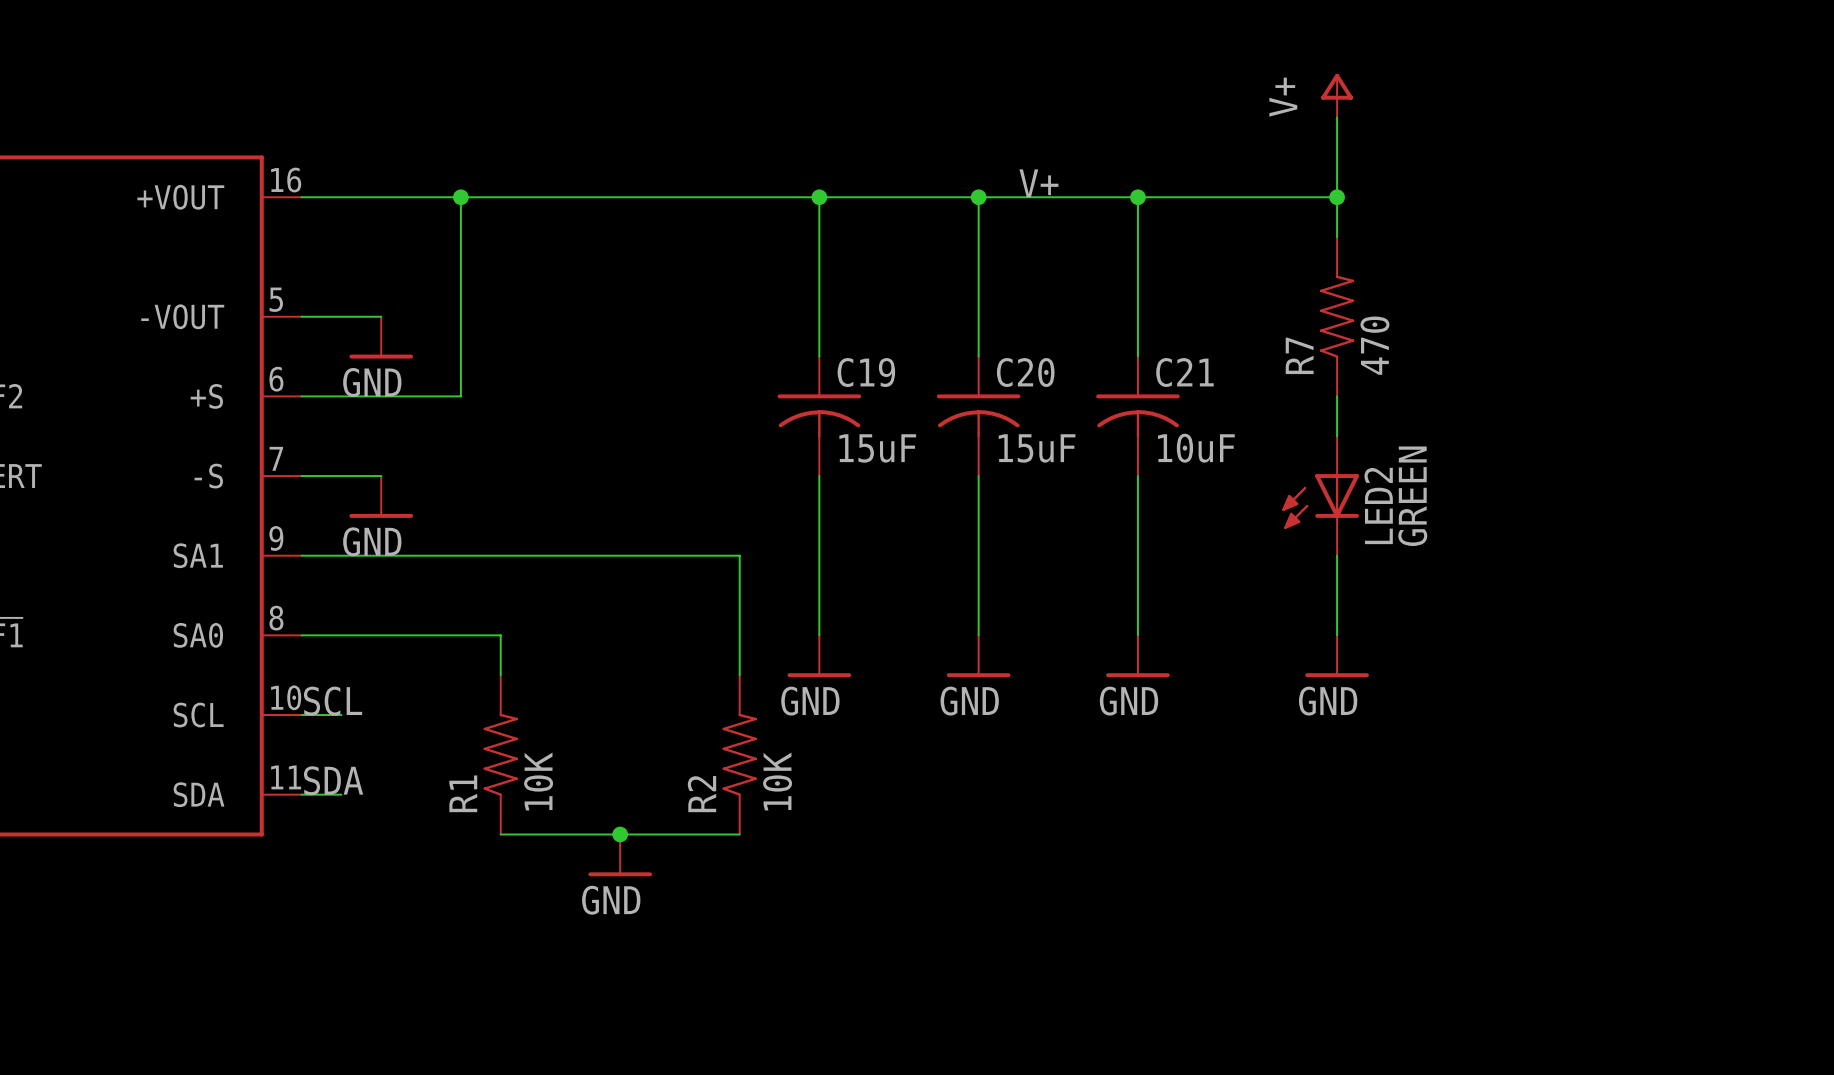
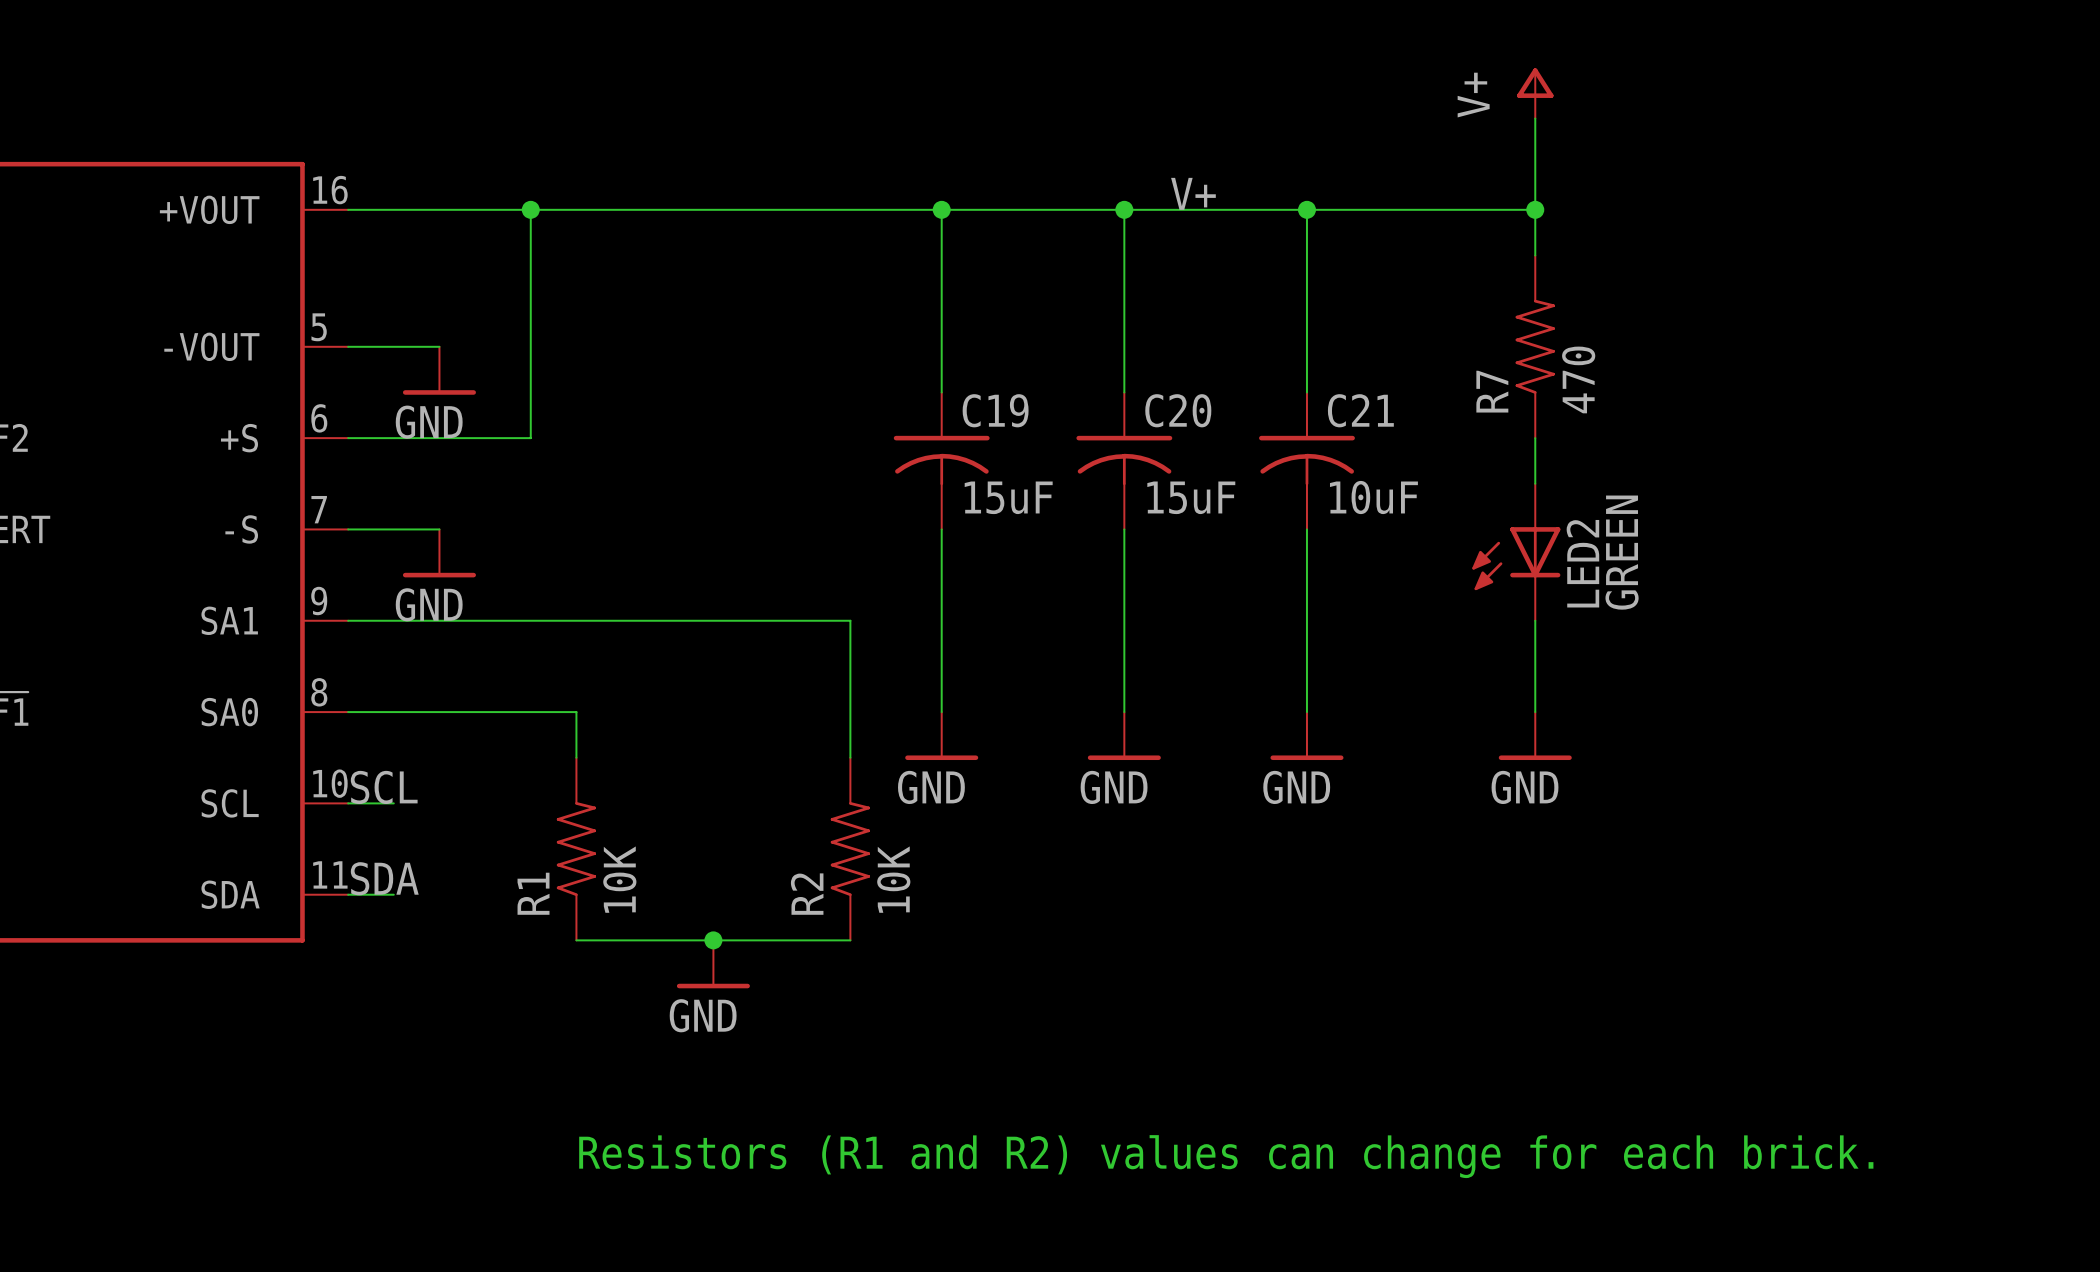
text: none -> Resistors (R1 and R2) values can change for each brick. (1226, 1156)

